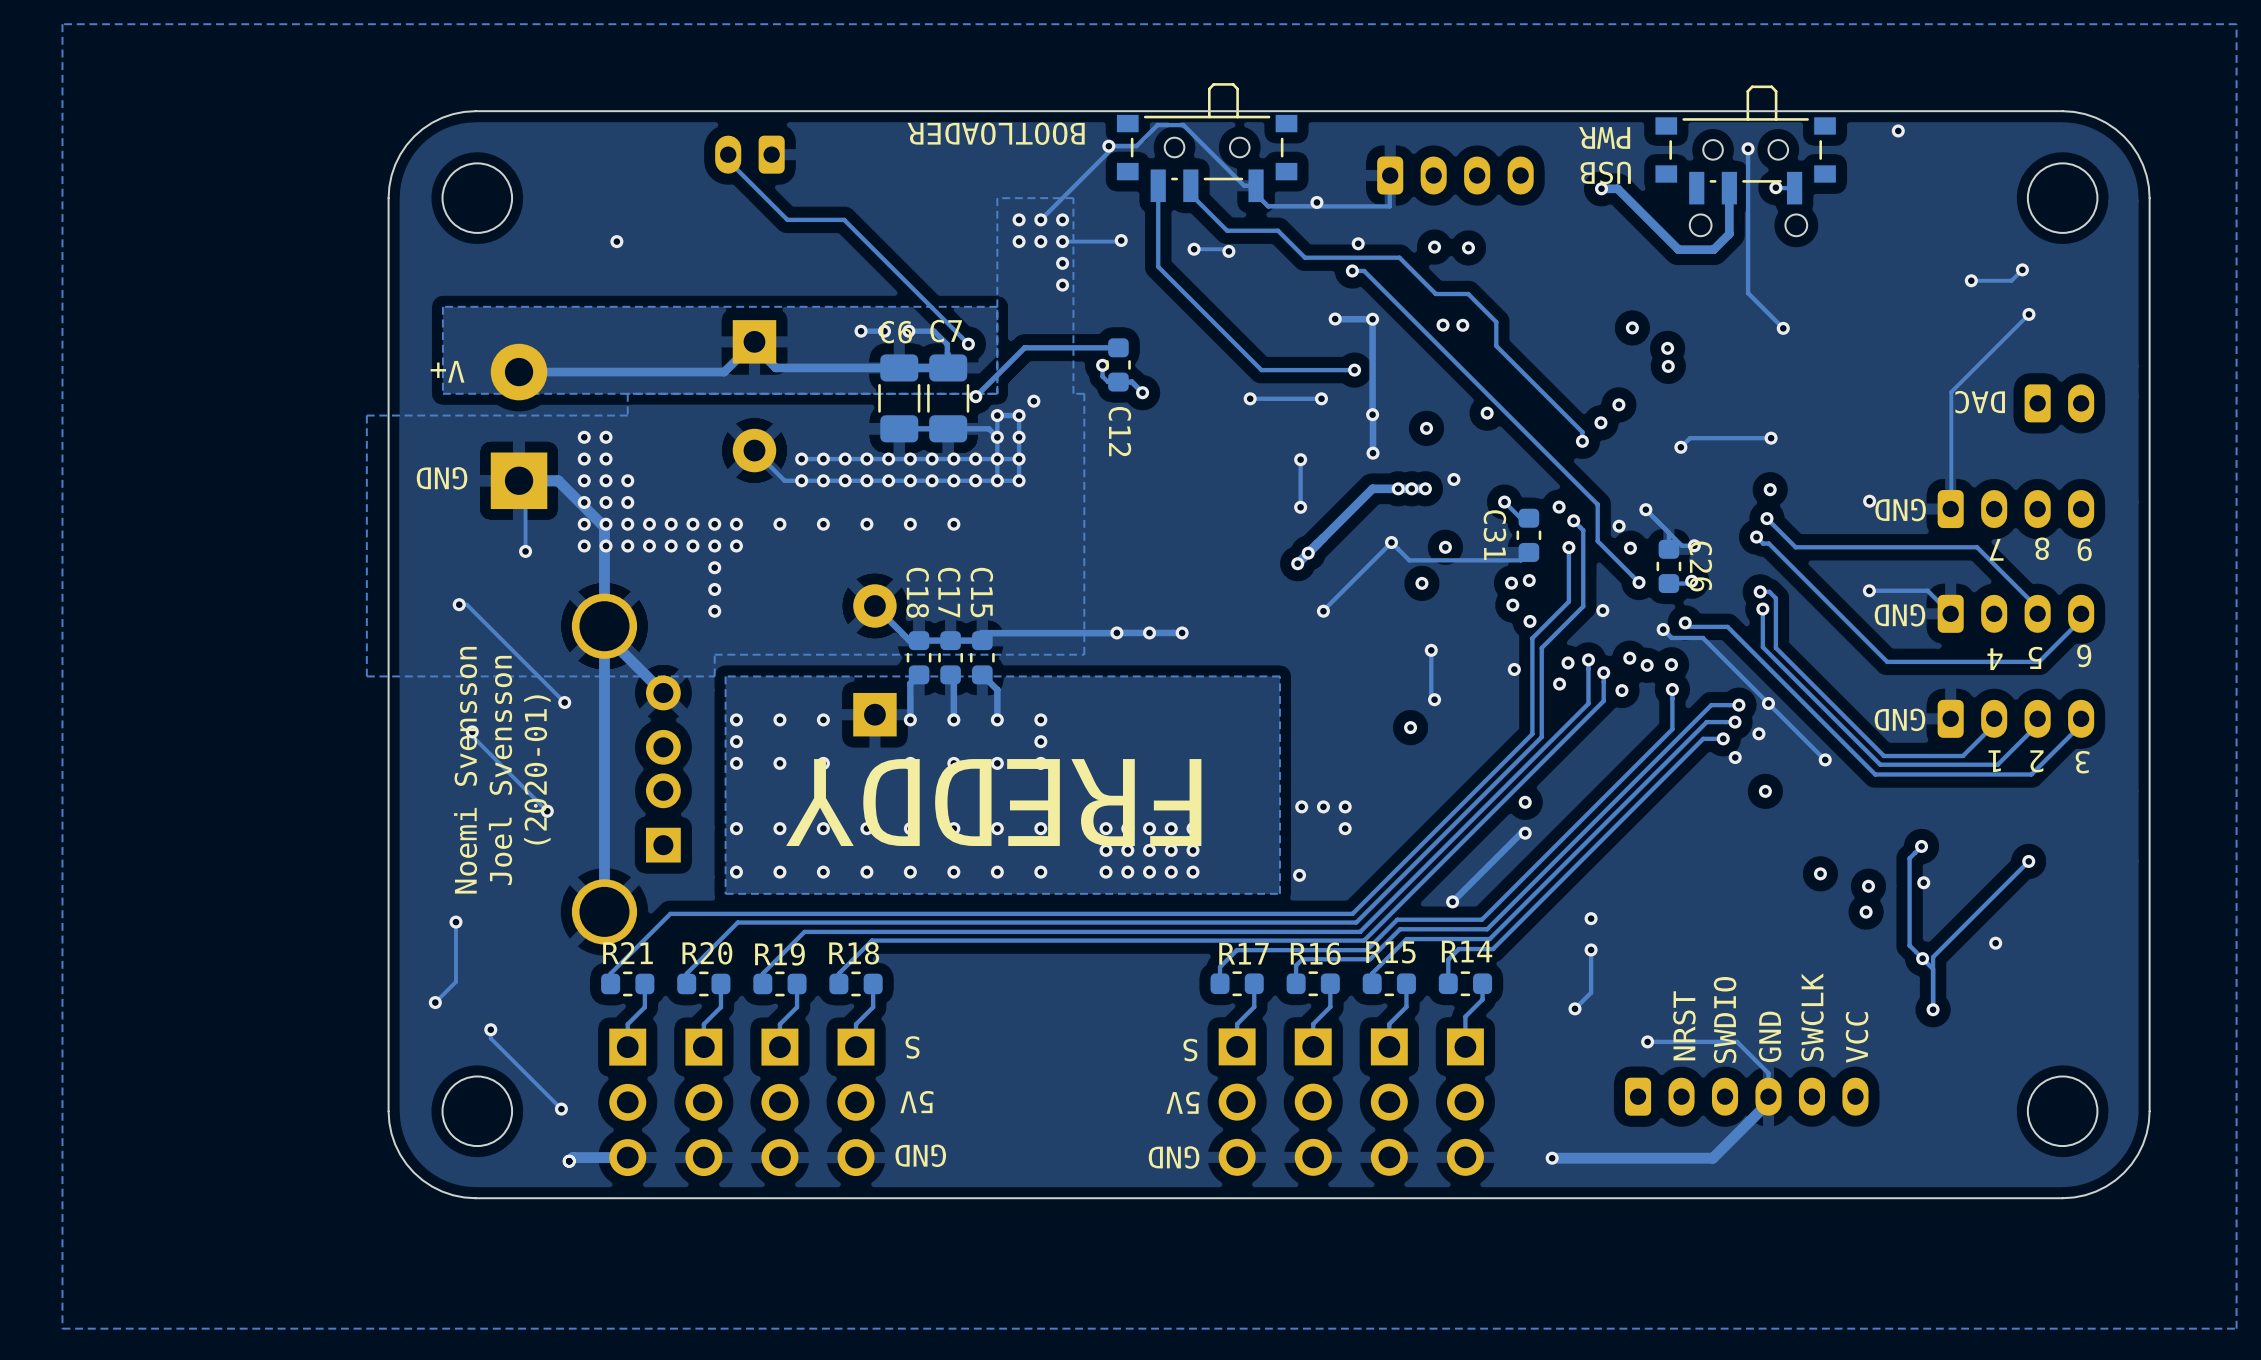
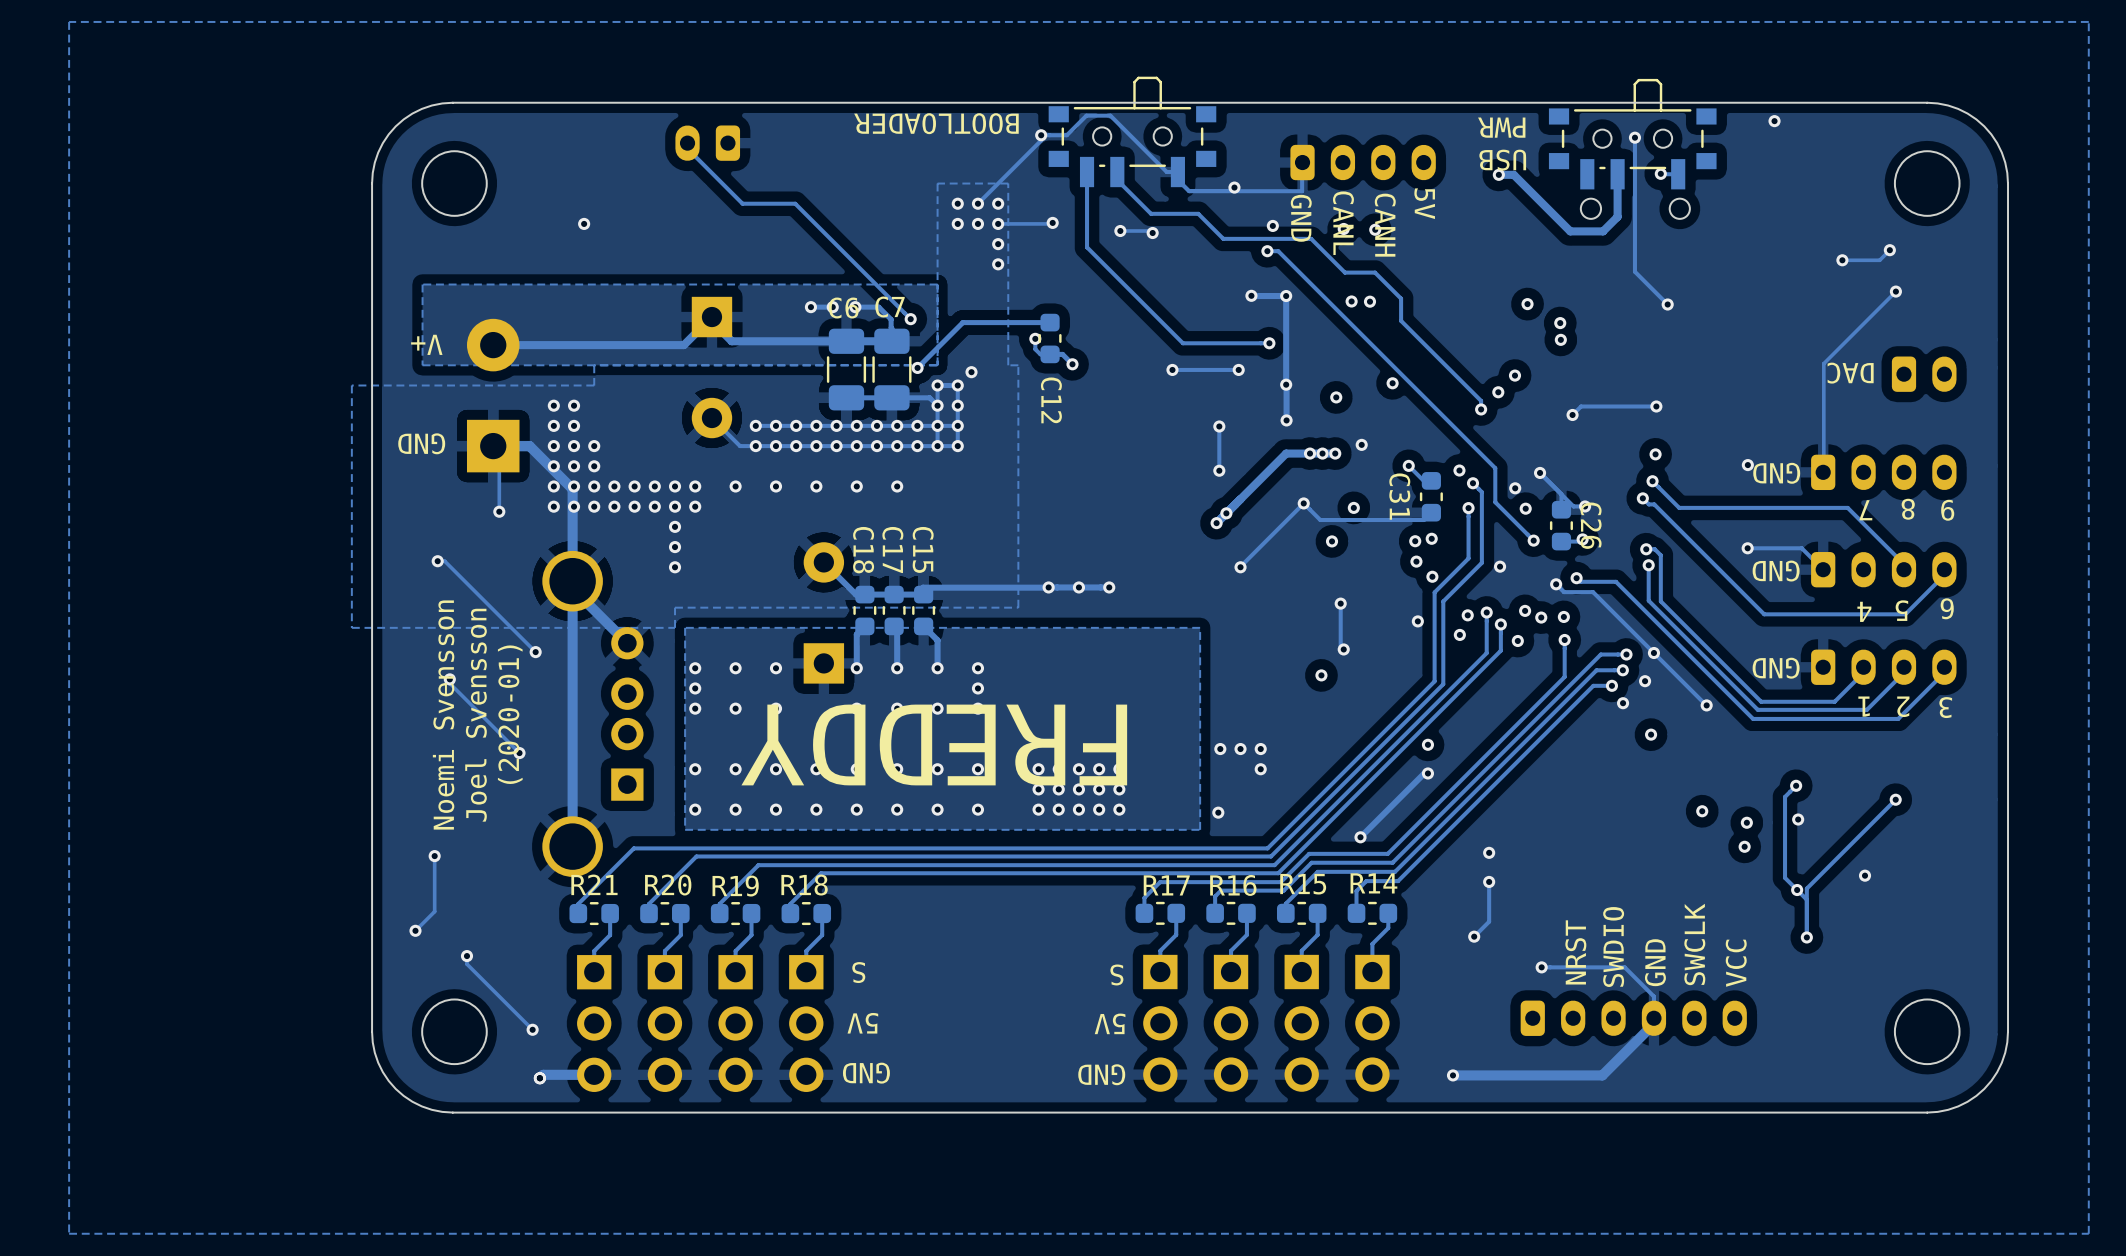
text: none -> 5V (1424, 203)
text: none -> GND (1301, 218)
text: none -> CANL (1343, 223)
text: none -> CANH (1385, 225)

